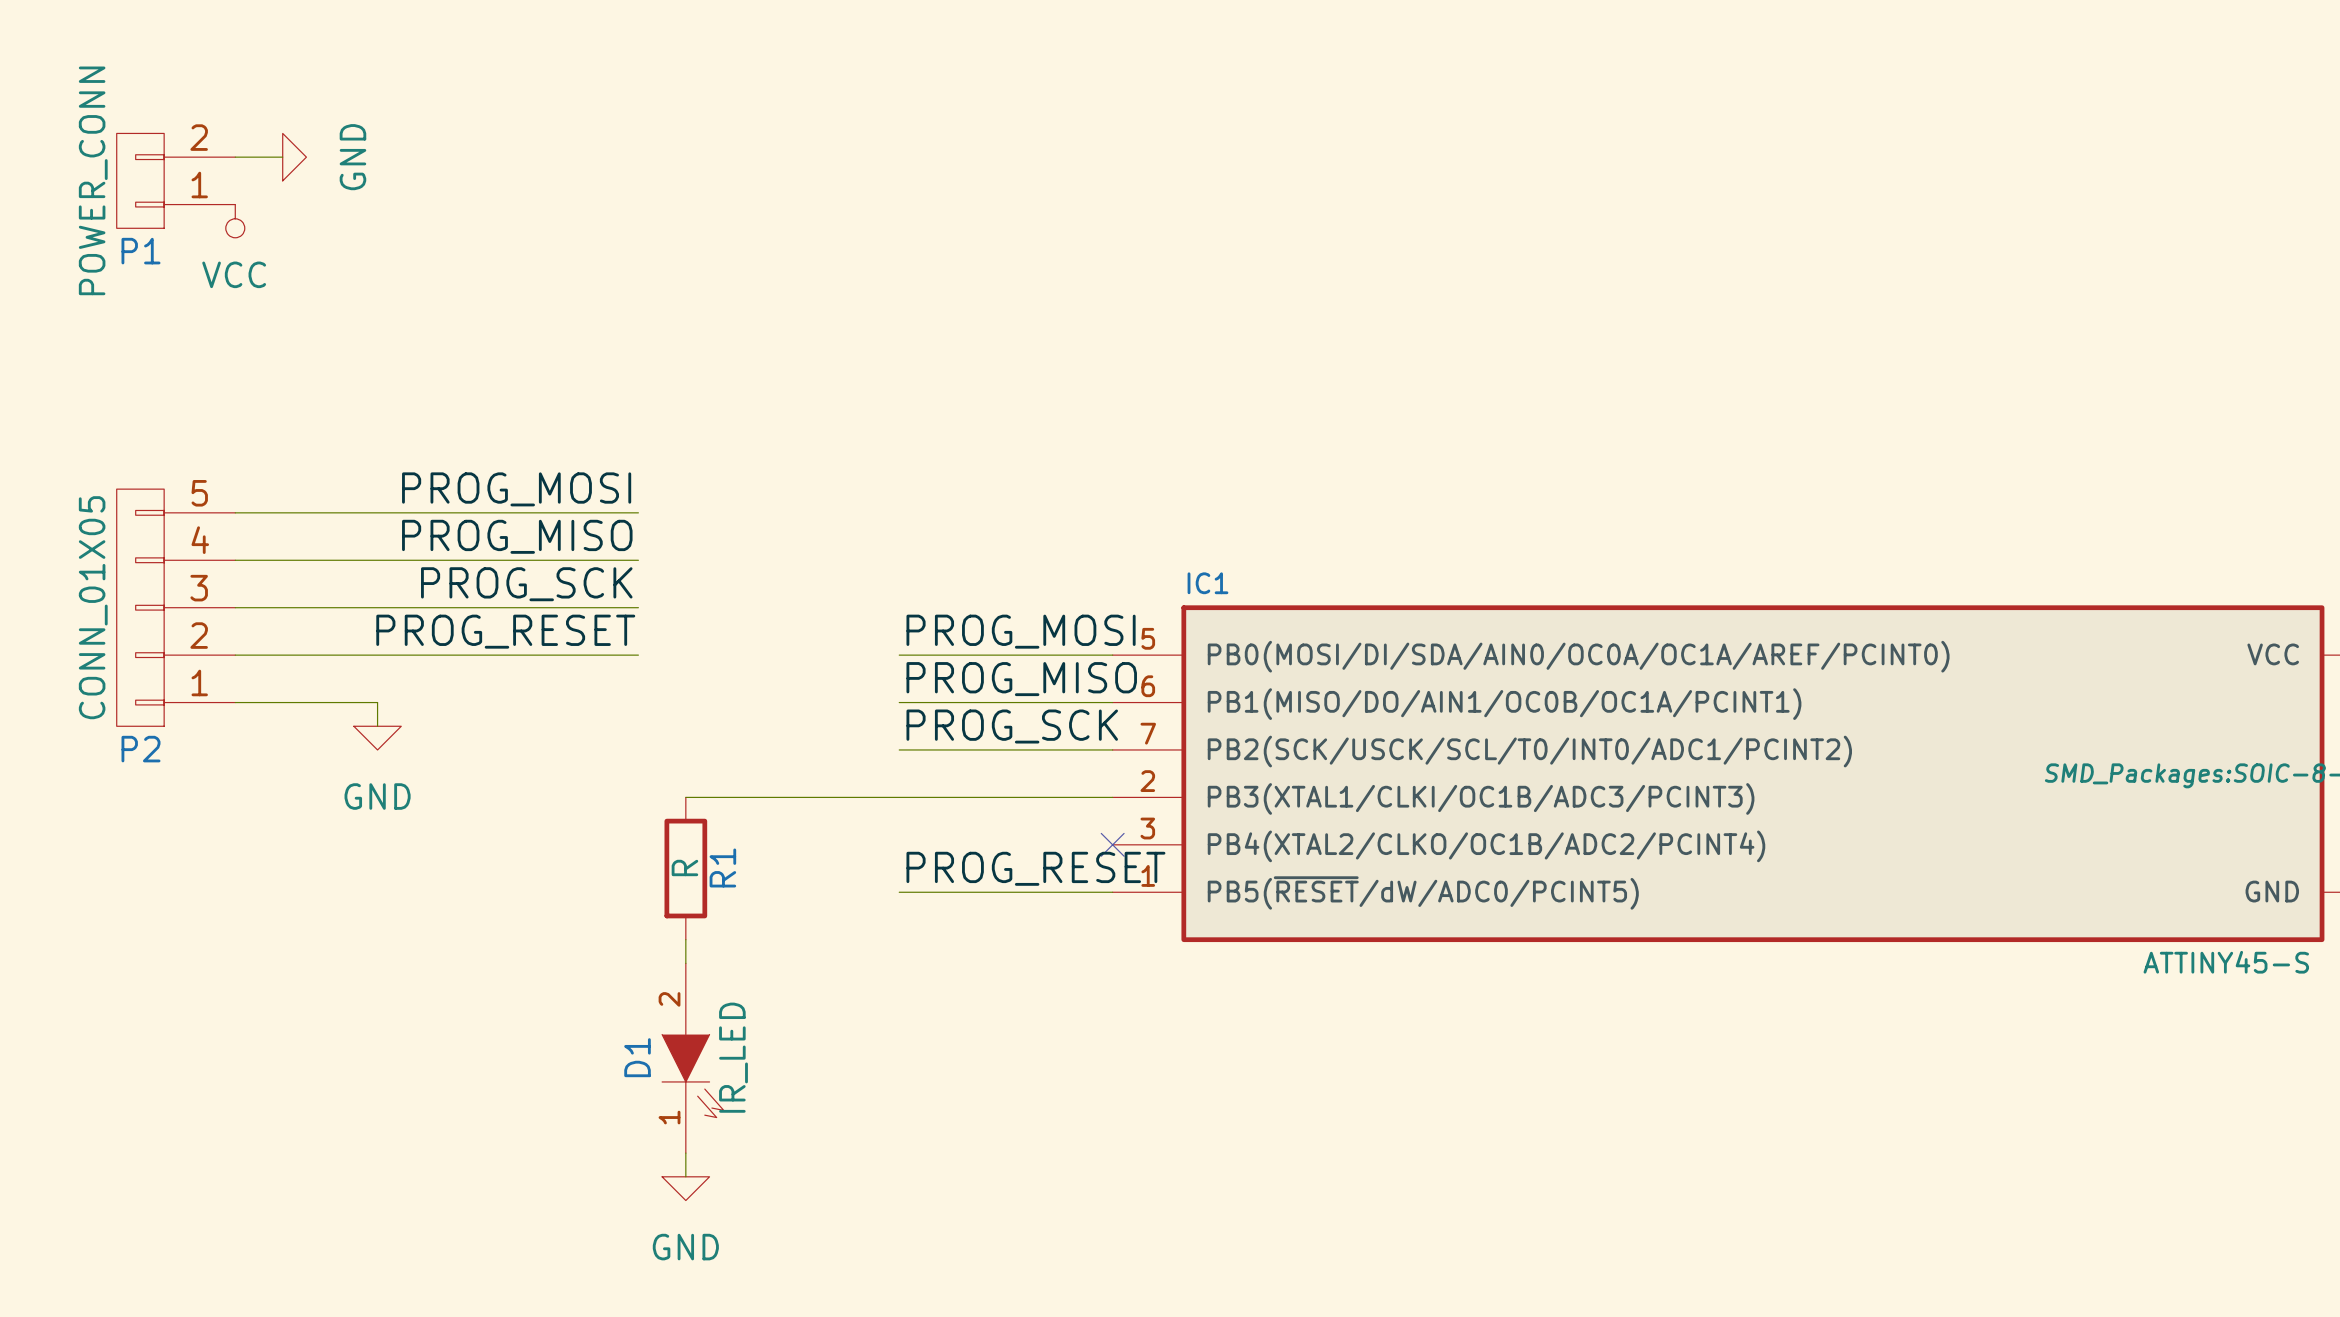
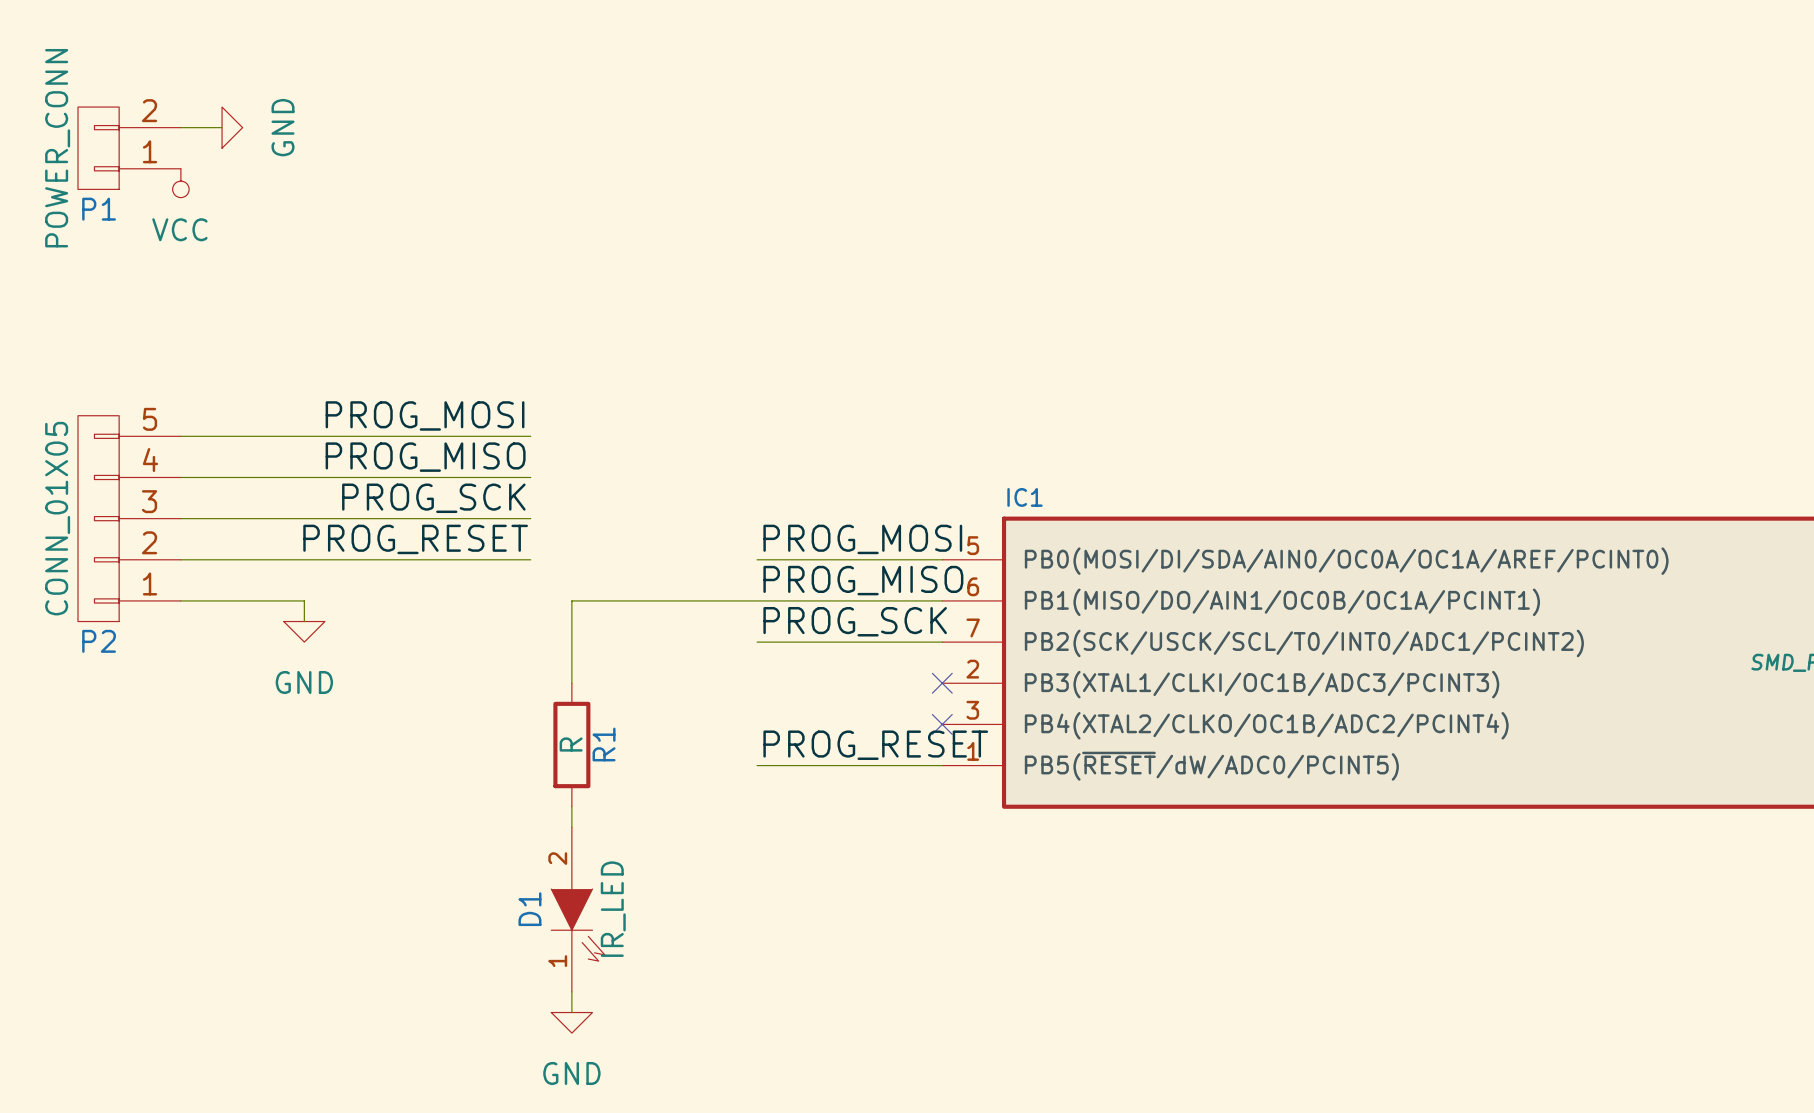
wire: (685, 797) (1112, 797) -> (571, 683) (571, 600) (757, 600)
no-connect mark: none -> (942, 683)

